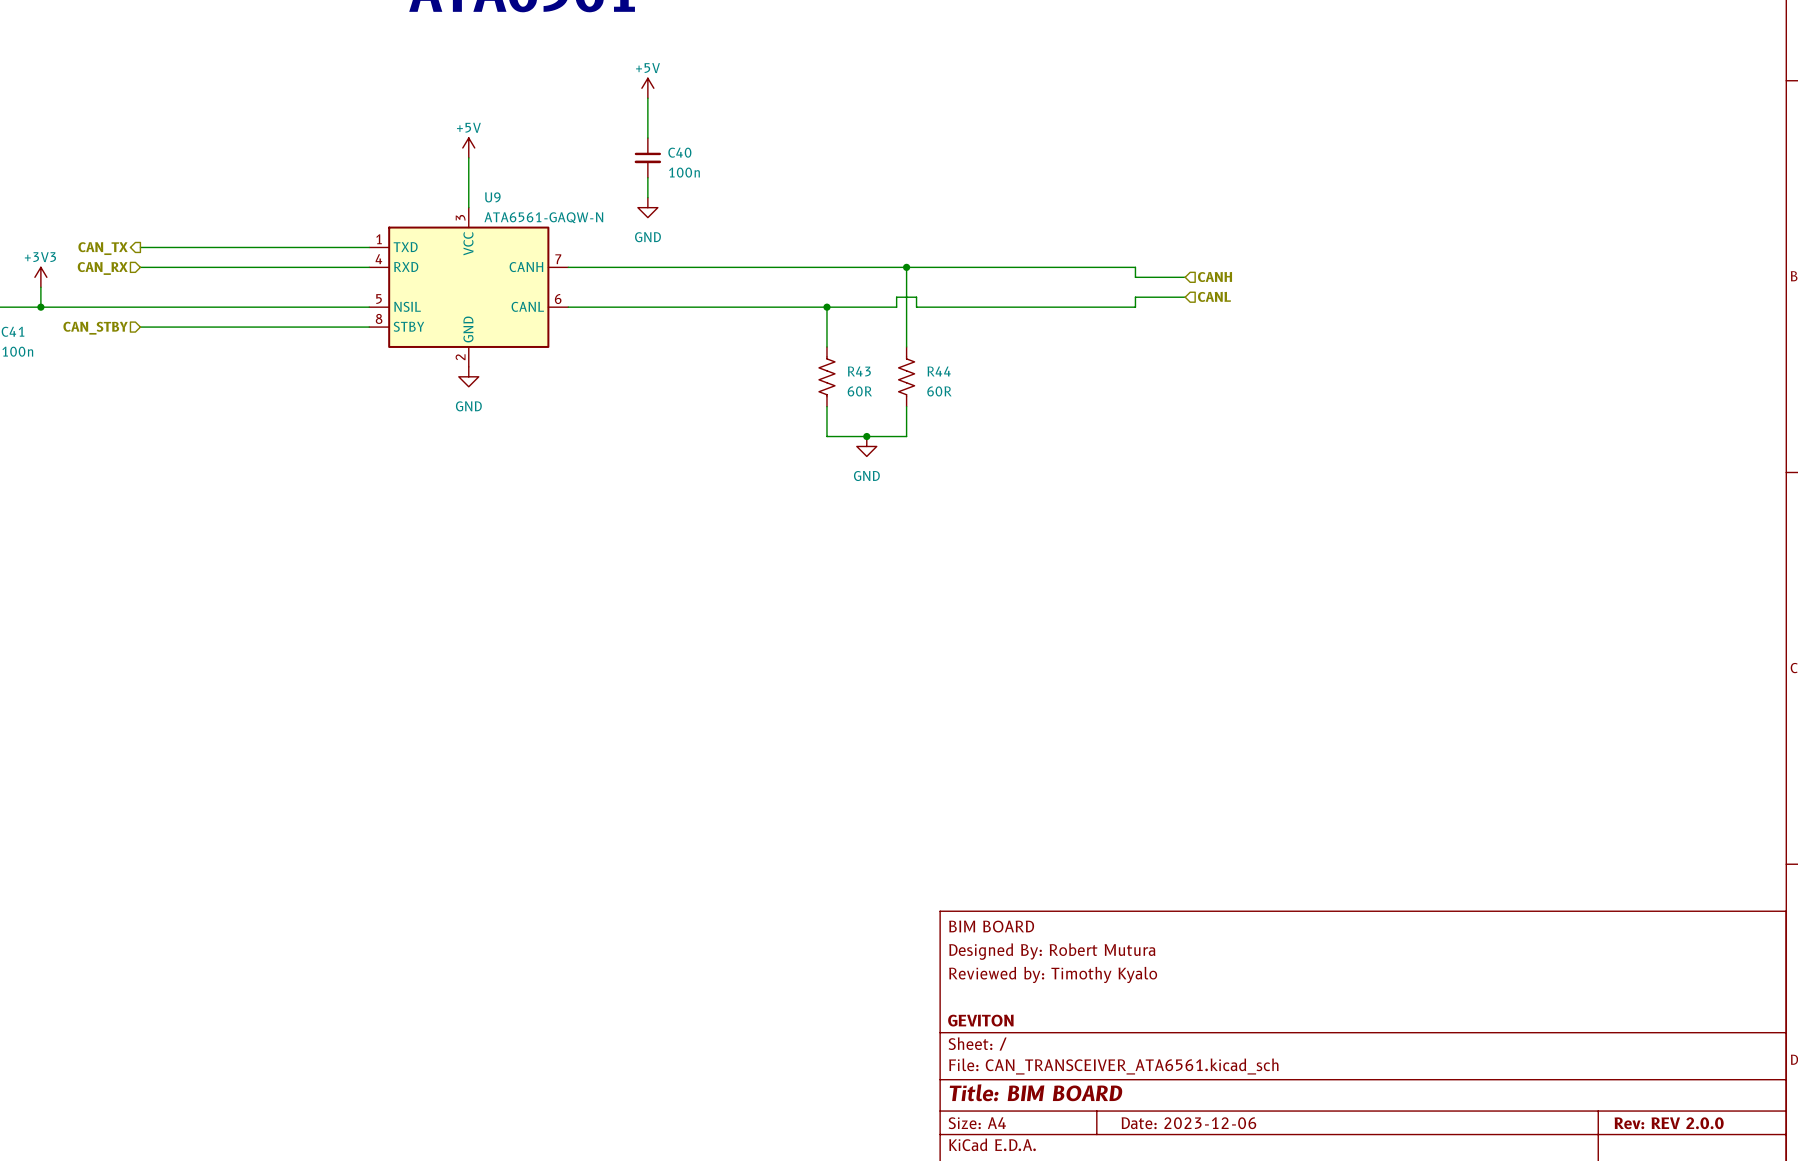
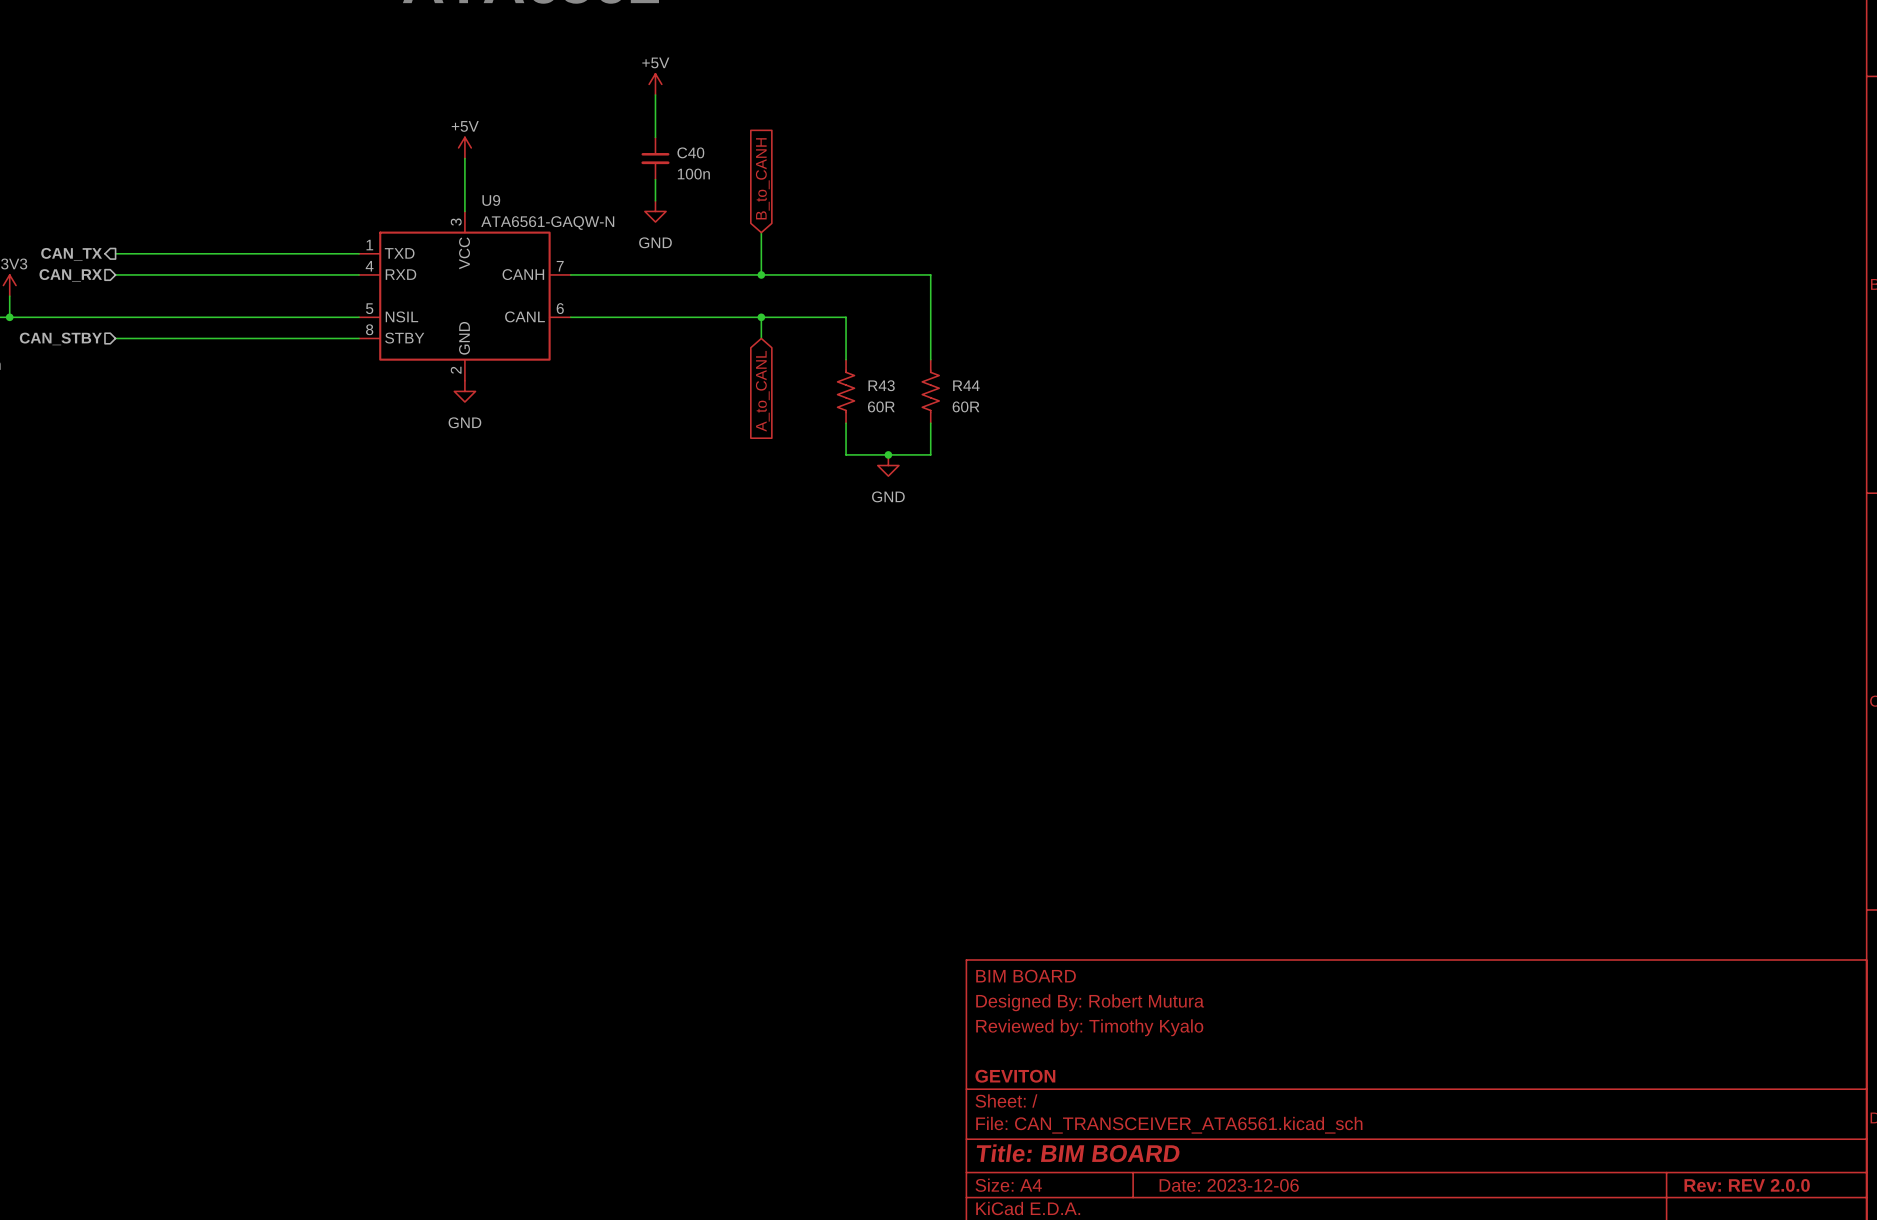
global label: none -> B_to_CANH (762, 178)
wire: none -> (761, 232) (761, 274)
junction: none -> (761, 274)
wire: (906, 267) (1135, 267) (1135, 277) (1185, 277) -> none
junction: (906, 267) -> none
hierarchical label: CANH (1215, 277) -> none
hierarchical label: CANL (1214, 296) -> none
wire: (1185, 297) (1135, 297) (1135, 307) (916, 307) (916, 297) (896, 297) (896, 307) (826, 307) -> none
wire: none -> (761, 317) (761, 338)
junction: none -> (761, 317)
junction: (826, 307) -> none
global label: none -> A_to_CANL (762, 391)

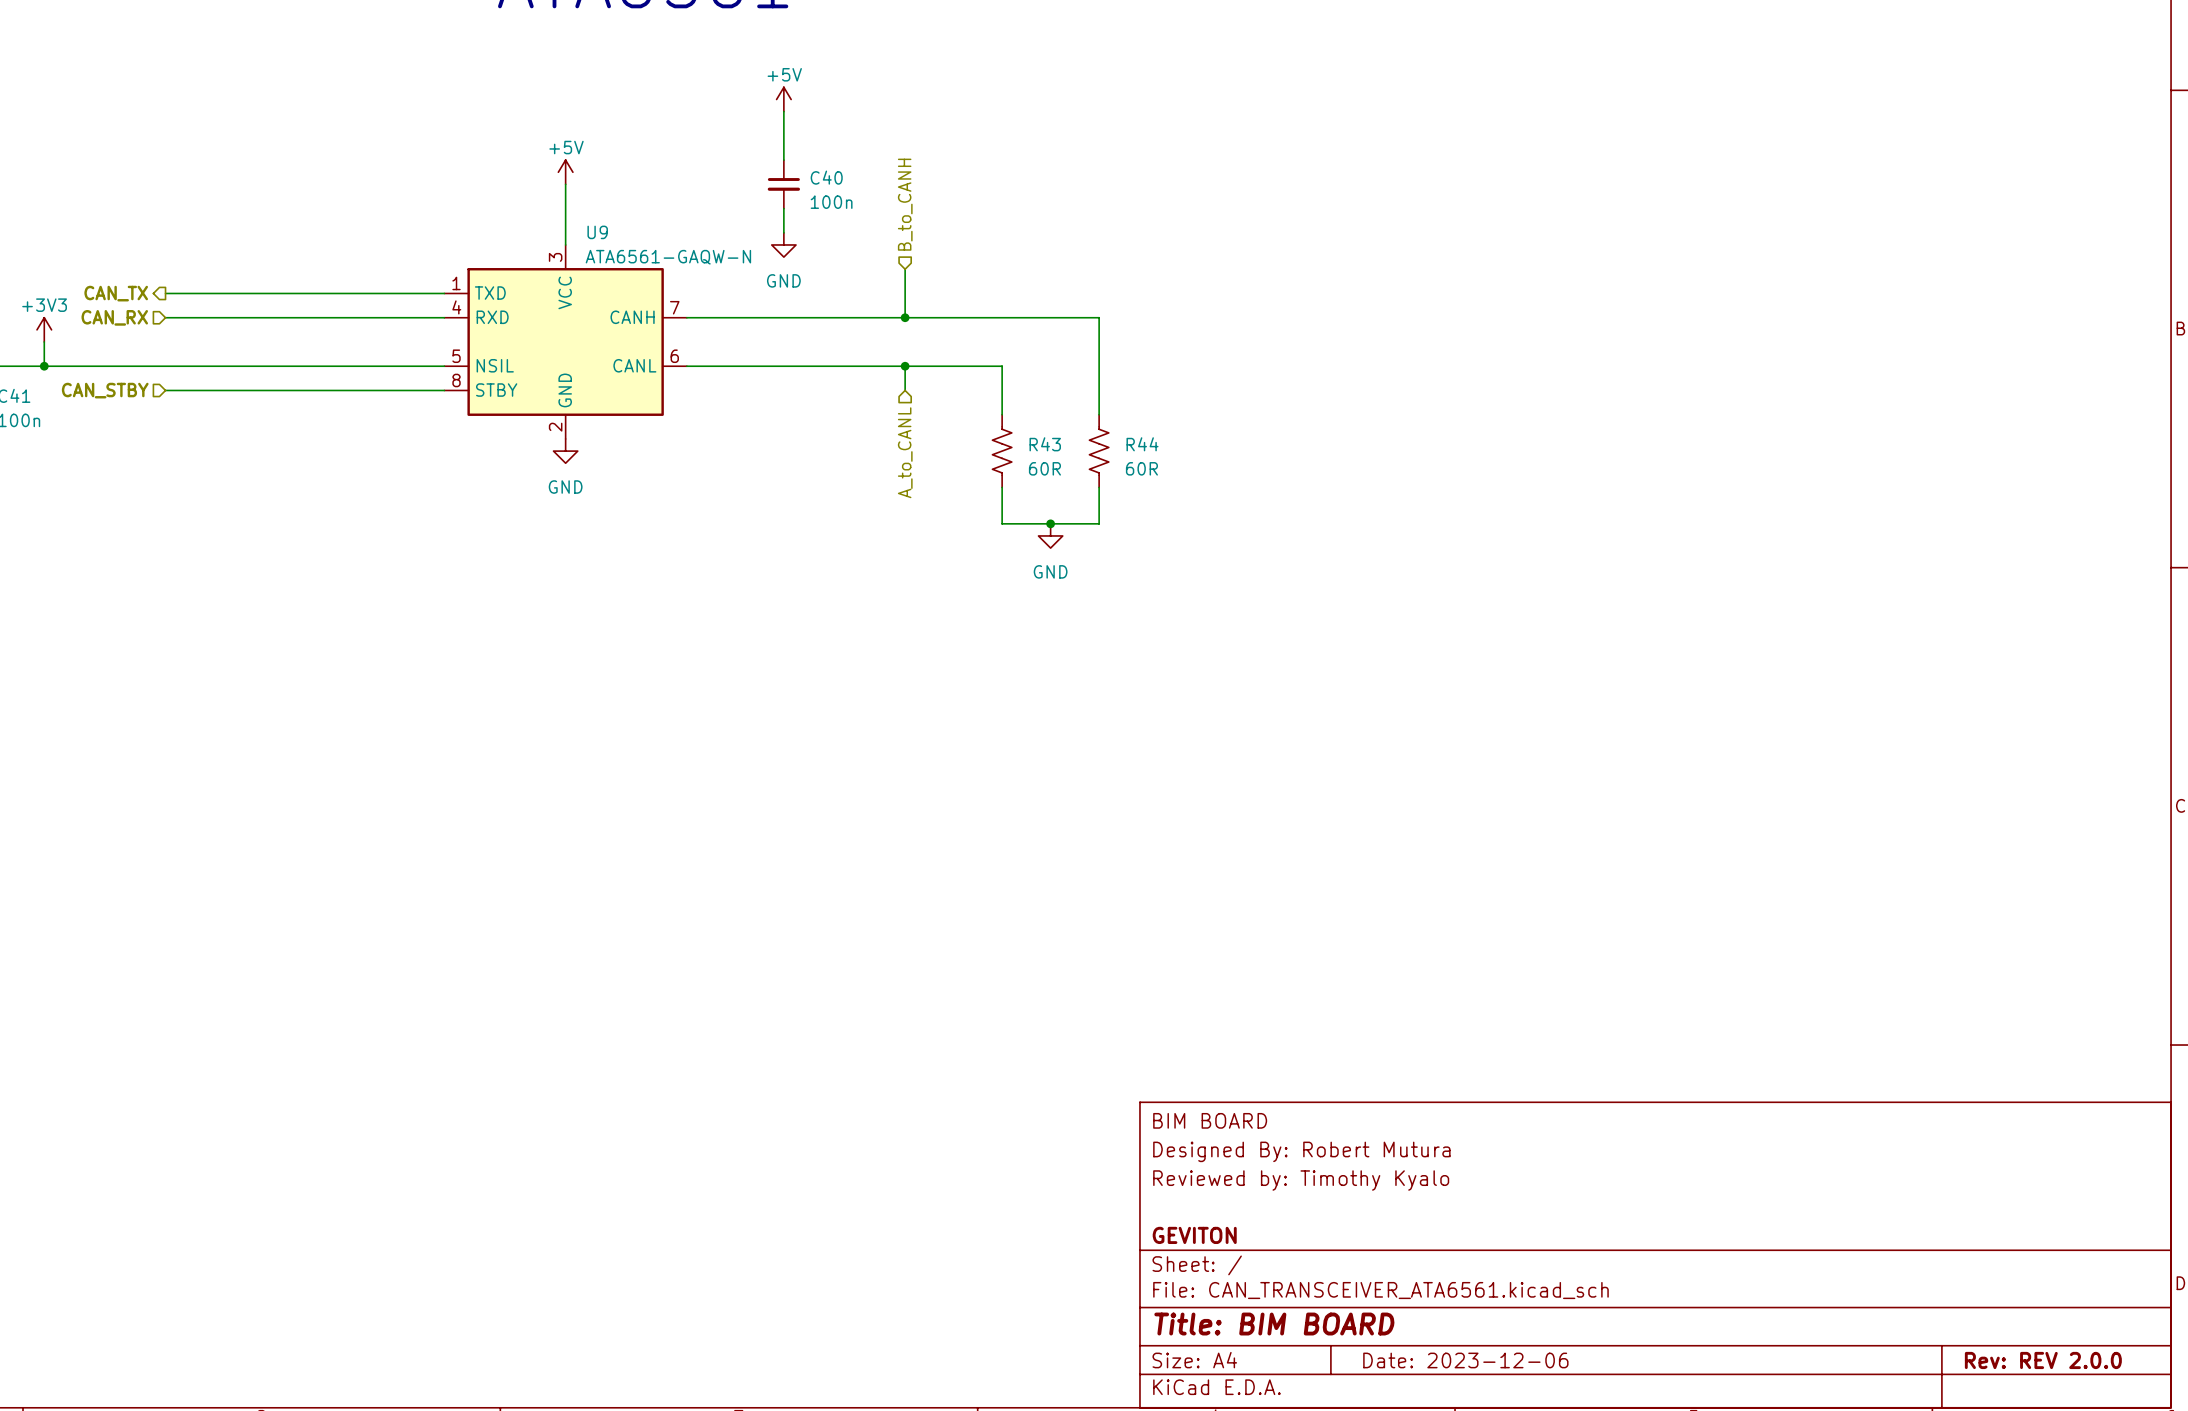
hierarchical label: none -> B_to_CANH (905, 204)
global label: B_to_CANH (762, 178) -> none
global label: A_to_CANL (762, 391) -> none
hierarchical label: none -> A_to_CANL (905, 452)

